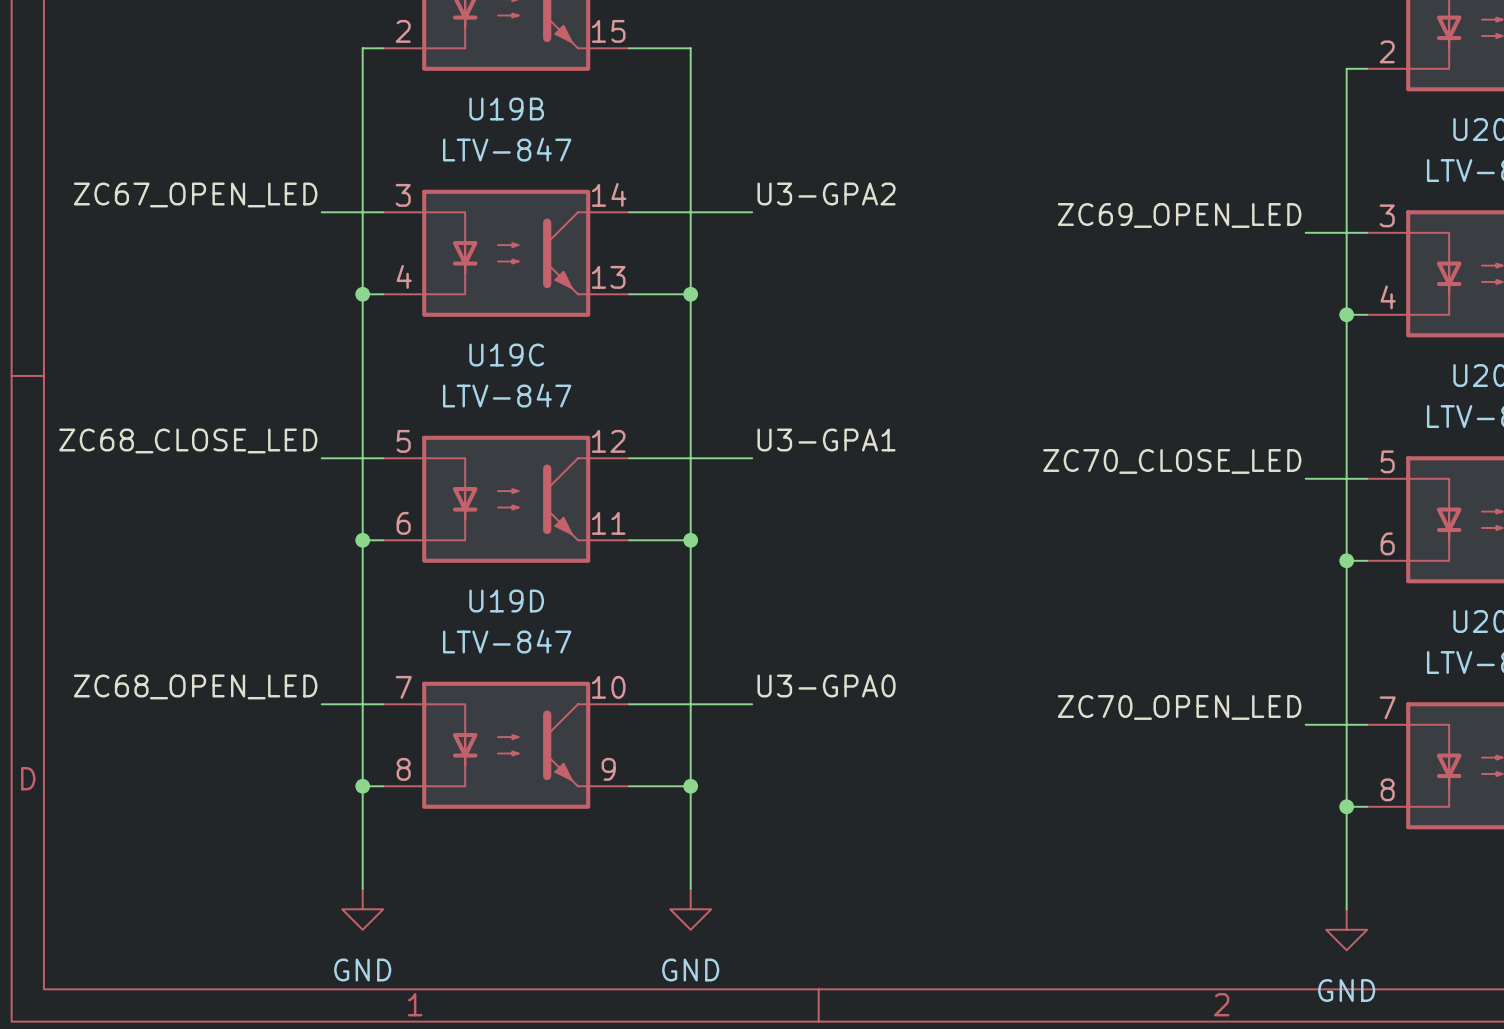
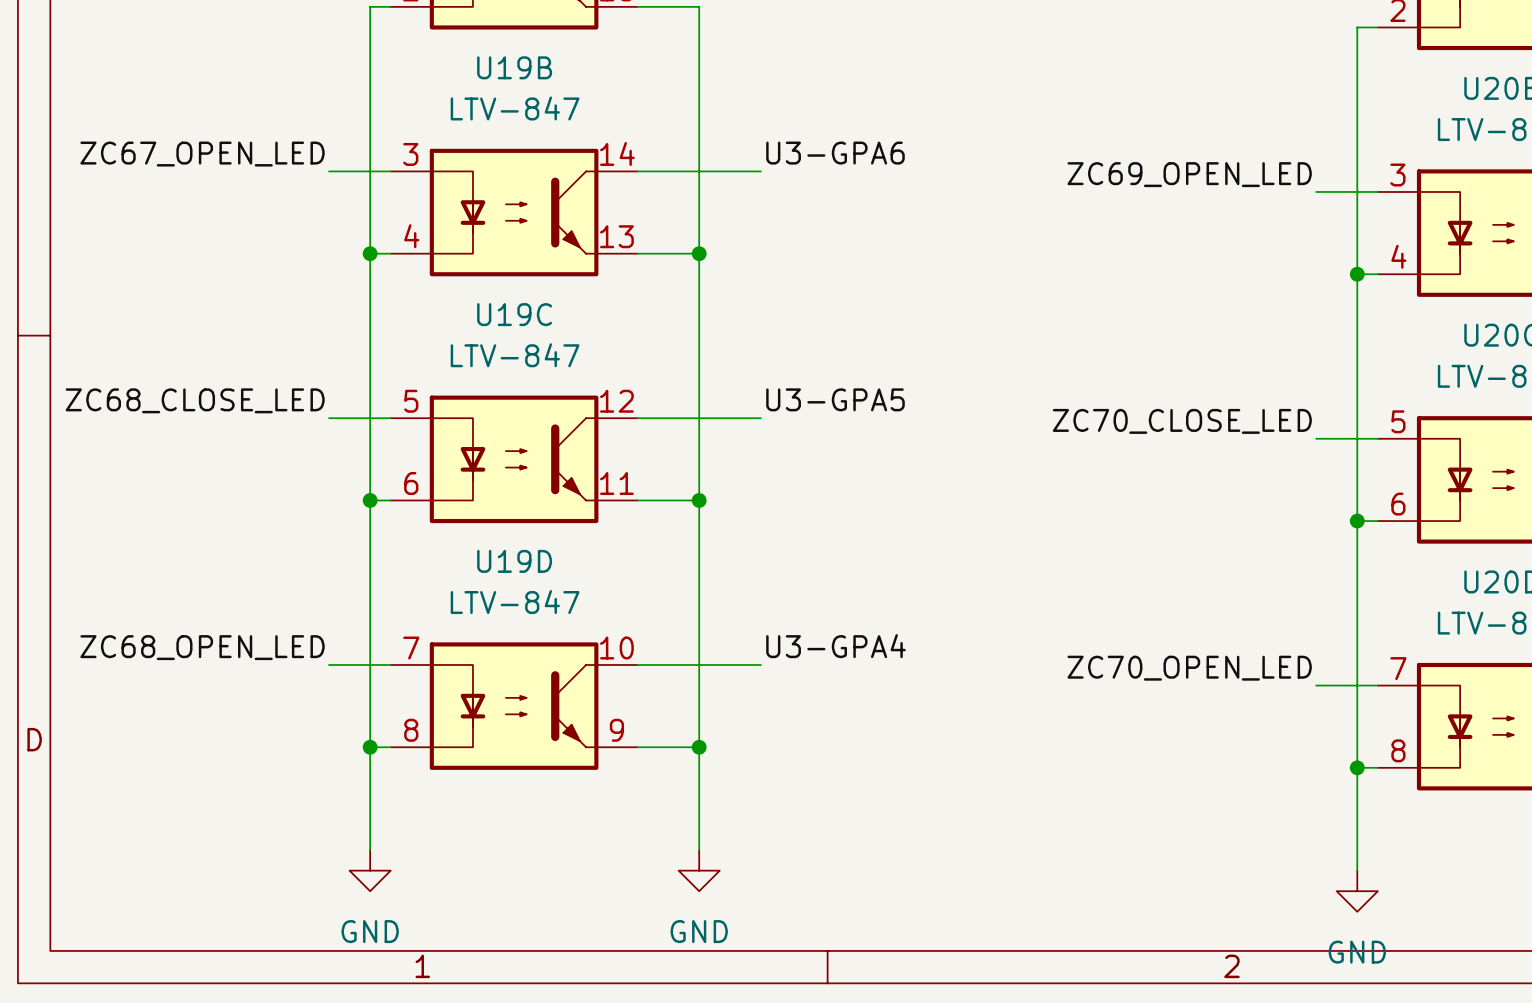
label: U3-GPA2 (826, 194) -> U3-GPA6 (835, 153)
label: U3-GPA1 (826, 440) -> U3-GPA5 (835, 399)
label: U3-GPA0 (826, 685) -> U3-GPA4 (835, 646)

